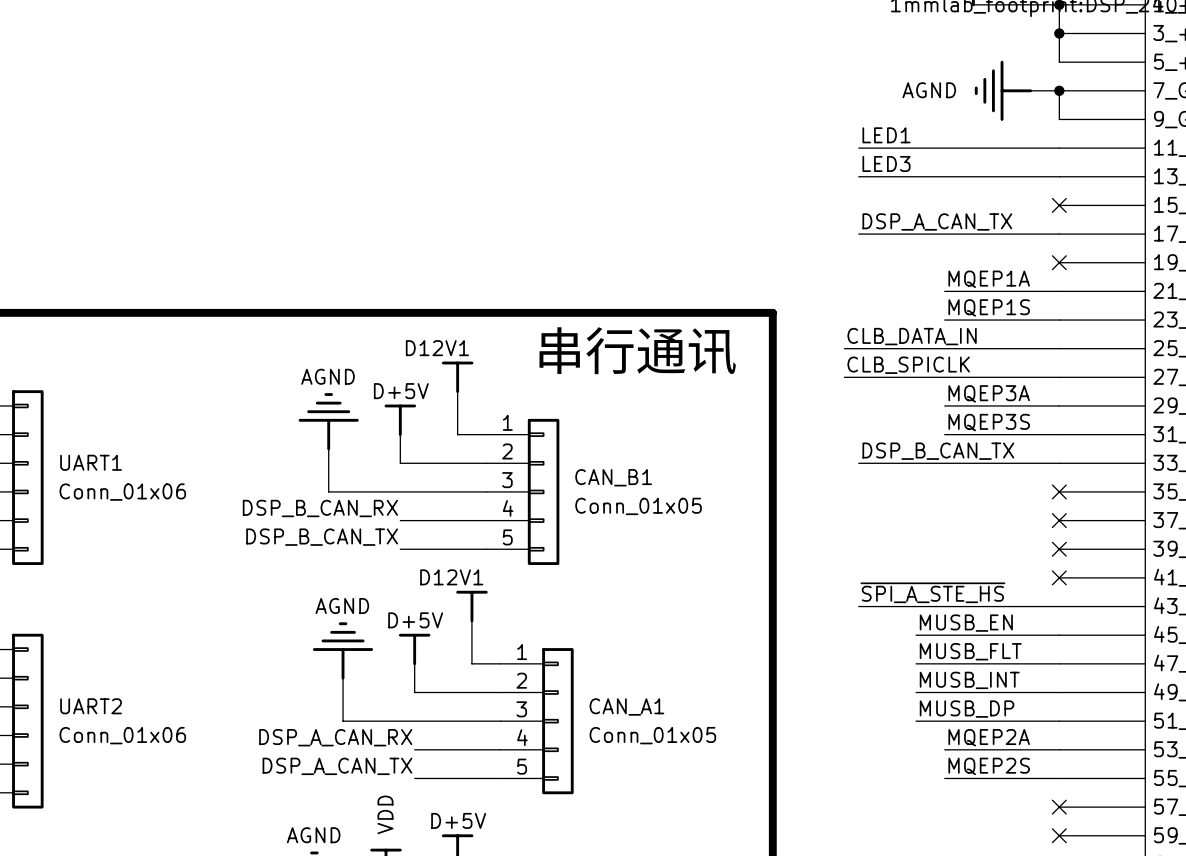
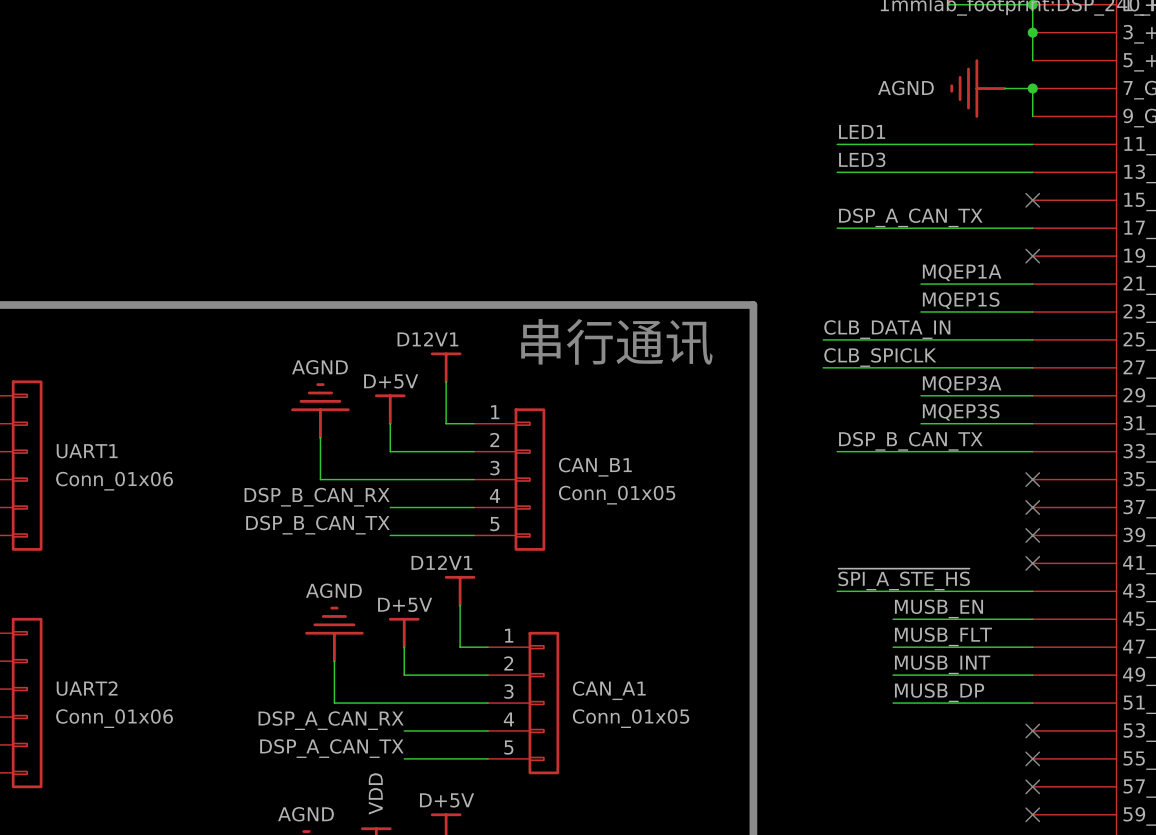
label: MQEP2A (989, 737) -> none
wire: (944, 749) (1059, 749) -> none
no-connect mark: none -> (1032, 730)
label: MQEP2S (989, 766) -> none
wire: (944, 778) (1059, 778) -> none
no-connect mark: none -> (1032, 758)

